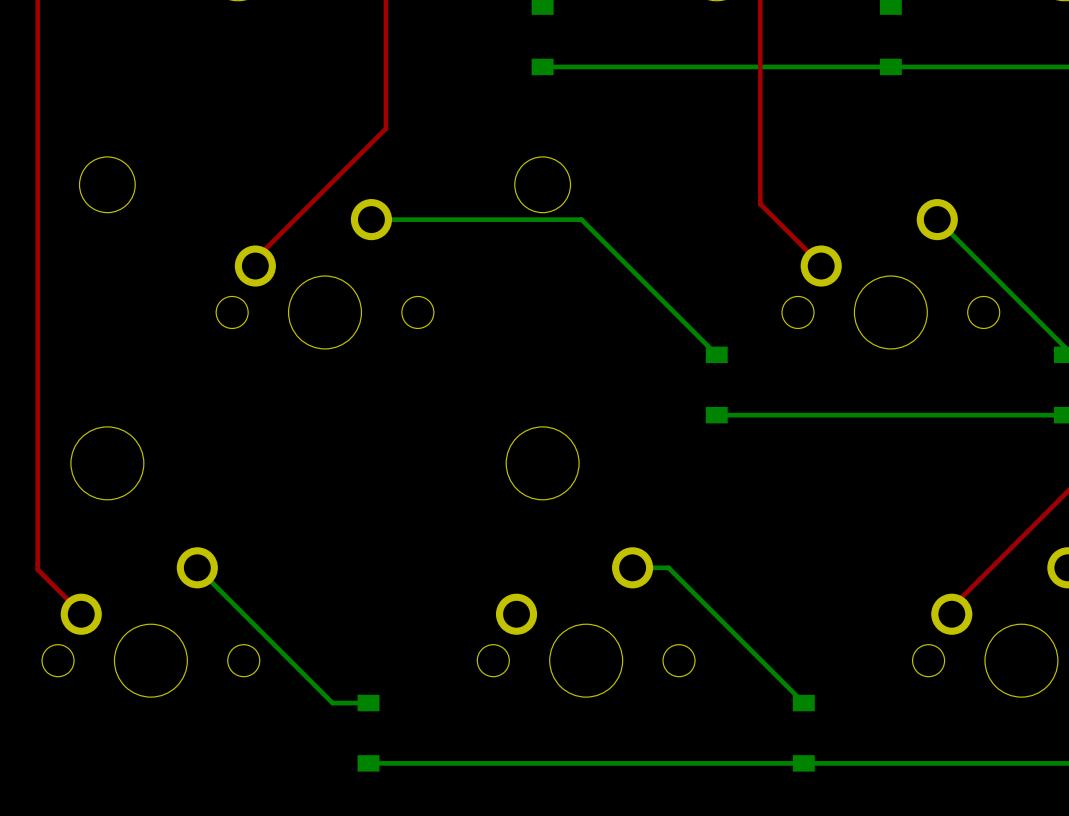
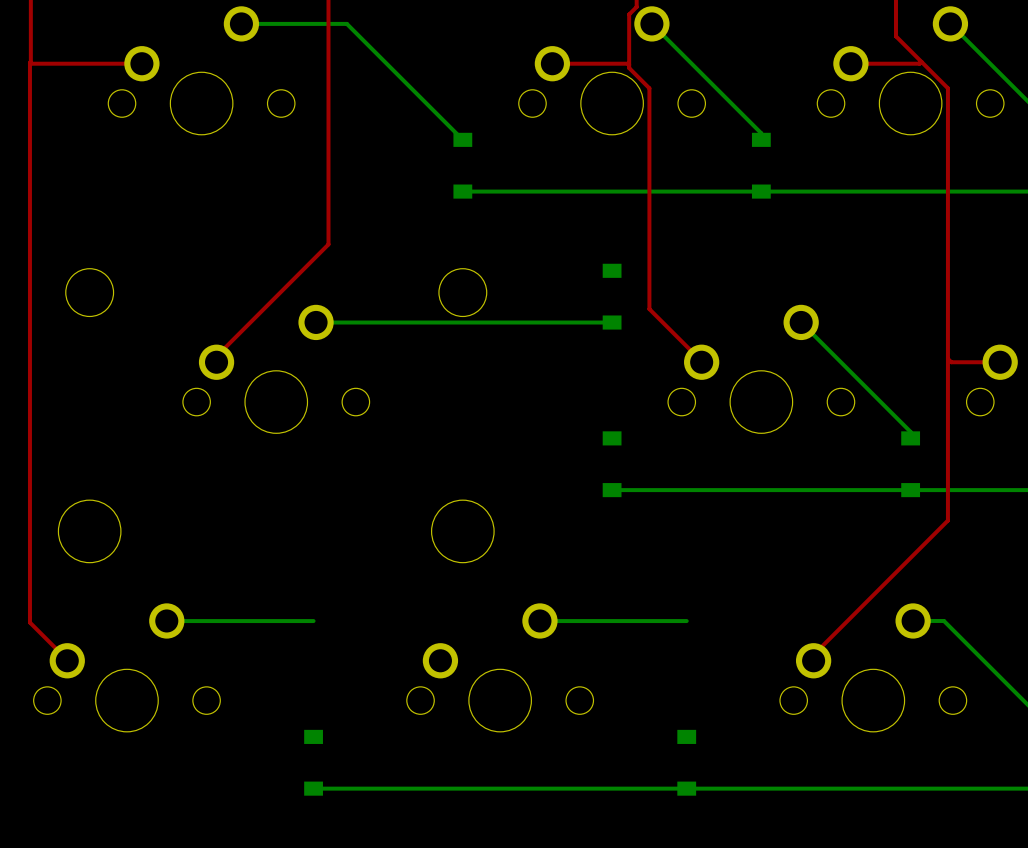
part: none -> (612, 296)
bottom track: none -> (314, 322) (612, 322)
bottom track: (371, 219) (581, 219) (716, 354) -> none
bottom track: none -> (165, 621) (313, 621)
bottom track: (197, 567) (332, 703) (368, 703) -> none
bottom track: none -> (538, 621) (686, 621)
bottom track: (632, 567) (668, 567) (803, 703) -> none

